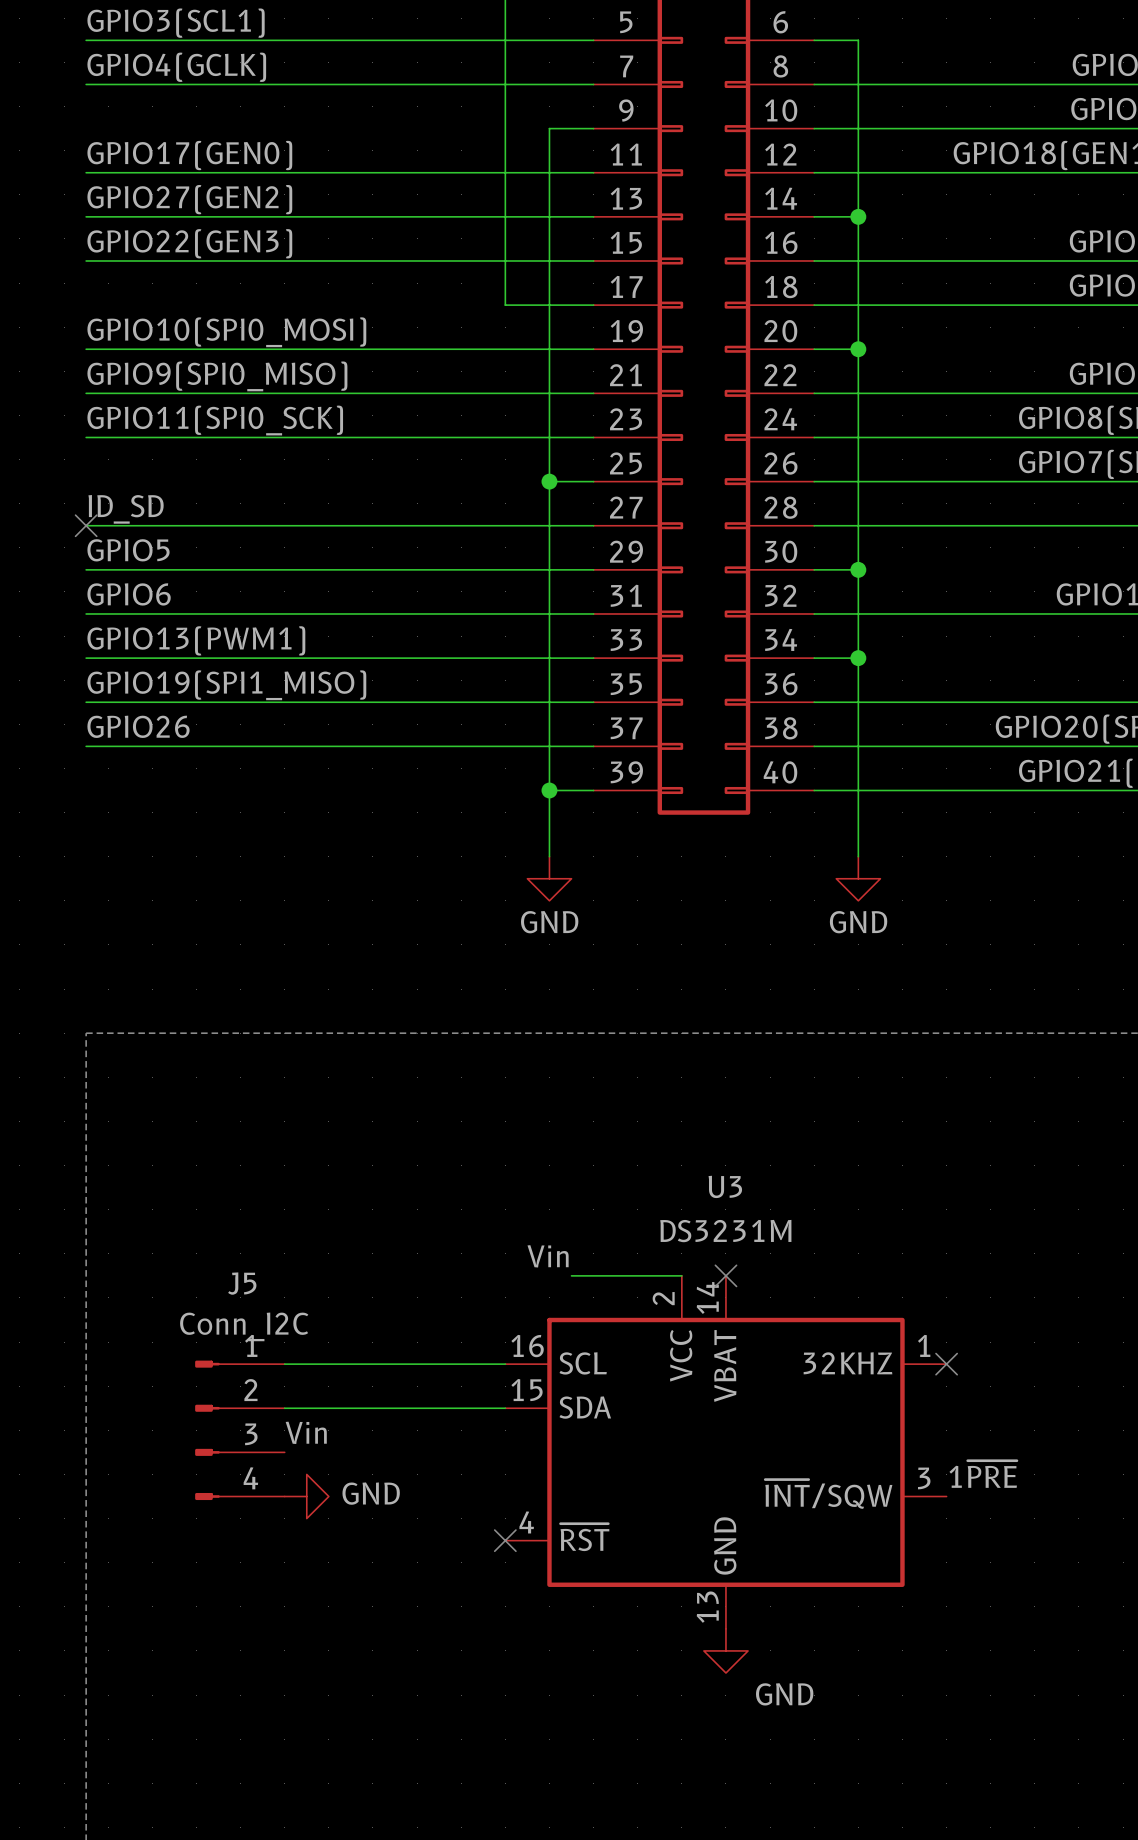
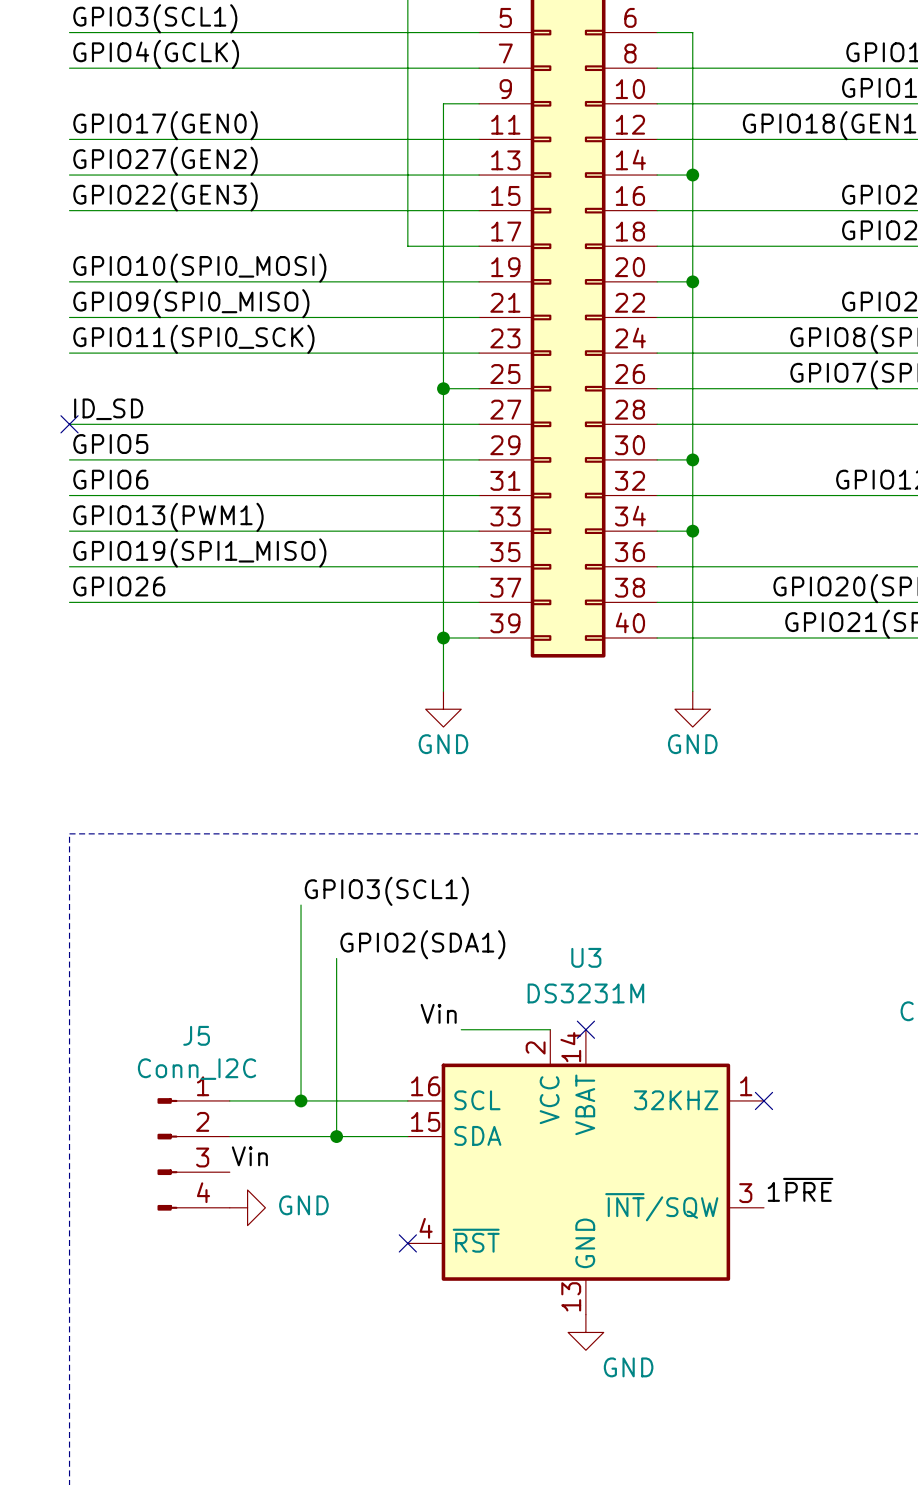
label: none -> GPIO3(SCL1) (386, 891)
wire: none -> (301, 905) (301, 1100)
label: none -> GPIO2(SDA1) (422, 944)
wire: none -> (336, 958) (336, 1136)
junction: none -> (301, 1100)
junction: none -> (336, 1136)

